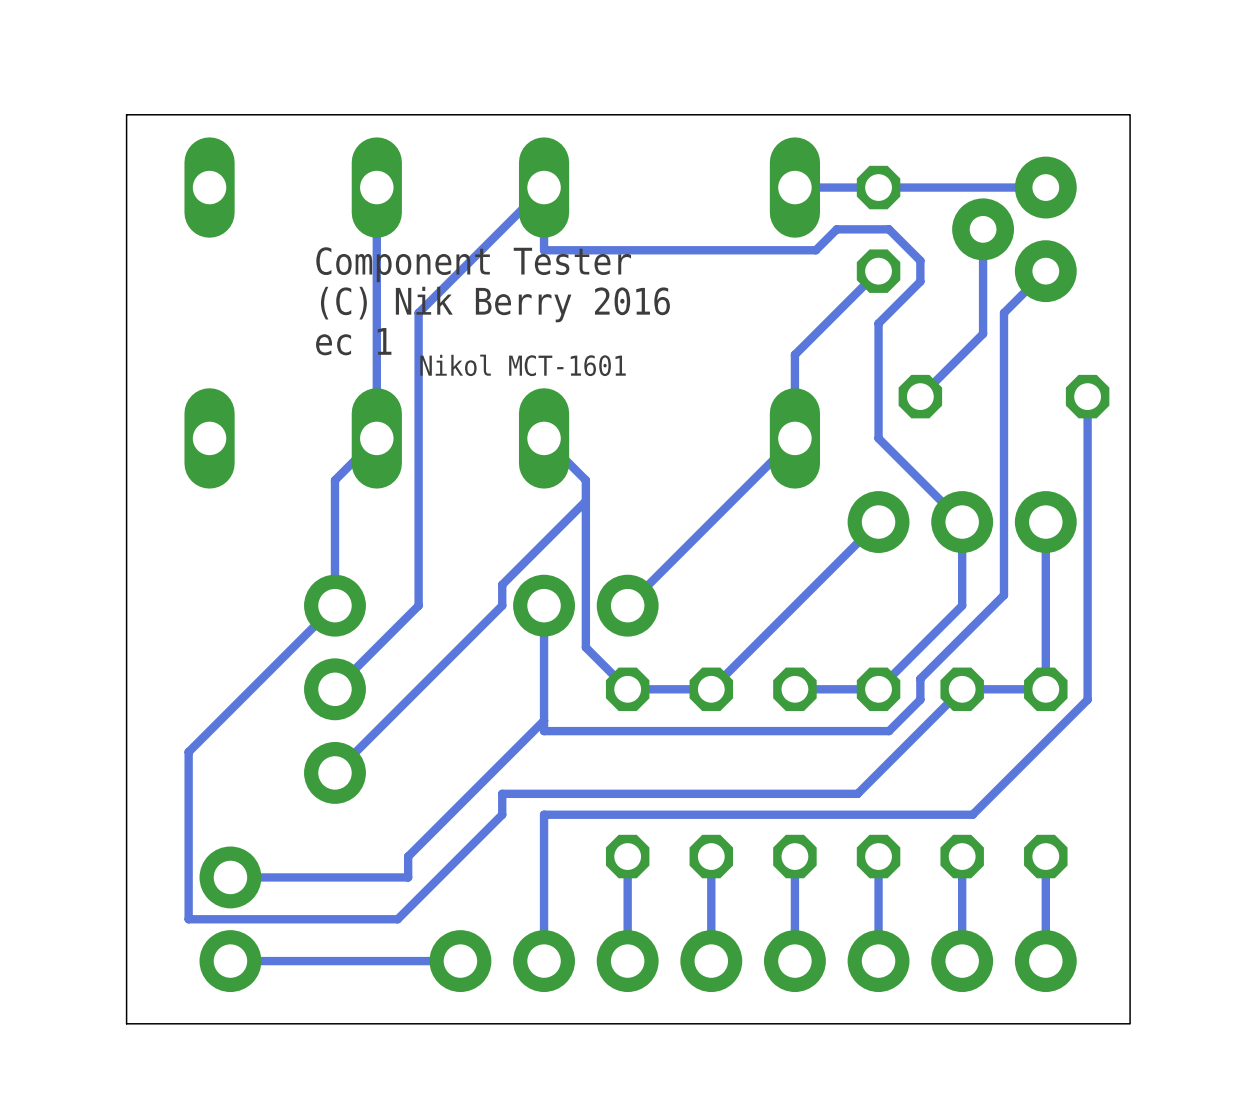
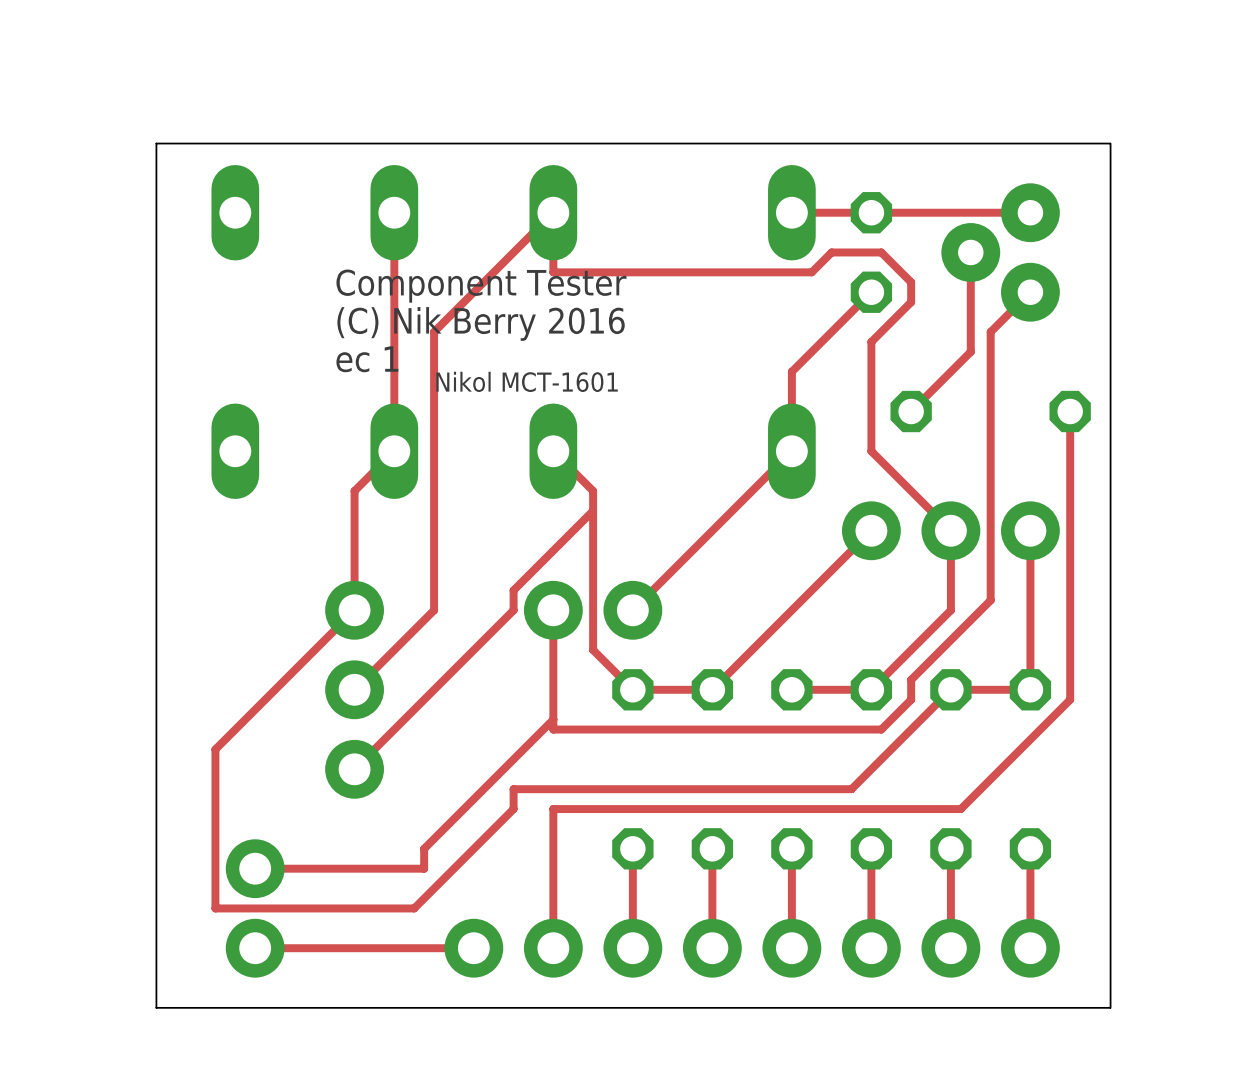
bottom track: (376, 187) (376, 438) (334, 480) (334, 605) (188, 752) (188, 919) (397, 919) (502, 814) (502, 793) (857, 793) (962, 689) (1045, 689) (1045, 522) -> none
top track: none -> (394, 212) (394, 451) (354, 491) (354, 610) (215, 749) (215, 908) (414, 908) (513, 809) (513, 789) (851, 789) (950, 689) (1030, 689) (1030, 530)
bottom track: (1045, 187) (794, 187) -> none
top track: none -> (1030, 212) (791, 212)
bottom track: (983, 229) (983, 333) (920, 396) -> none
top track: none -> (970, 252) (970, 351) (911, 411)
bottom track: (878, 271) (794, 354) (794, 438) (627, 605) -> none
top track: none -> (871, 292) (791, 371) (791, 451) (632, 610)
bottom track: (1045, 271) (1003, 312) (1003, 595) (920, 678) (920, 699) (889, 731) (544, 731) (544, 605) -> none
top track: none -> (1030, 292) (990, 331) (990, 600) (911, 679) (911, 699) (881, 729) (553, 729) (553, 610)
bottom track: (1087, 396) (1087, 699) (972, 814) (544, 814) (544, 961) -> none
top track: none -> (1070, 411) (1070, 699) (960, 809) (553, 809) (553, 948)
bottom track: (544, 438) (585, 480) (585, 647) (627, 689) (711, 689) (878, 522) -> none
top track: none -> (553, 451) (593, 491) (593, 650) (632, 689) (712, 689) (871, 530)
bottom track: (585, 501) (502, 584) (502, 605) (334, 772) -> none
top track: none -> (593, 510) (513, 590) (513, 610) (354, 769)
bottom track: (794, 689) (878, 689) (962, 605) (962, 522) (878, 438) (878, 323) (920, 281) (920, 260) (889, 229) (836, 229) (815, 250) (544, 250) (544, 187) (418, 312) (418, 605) (334, 689) -> none
top track: none -> (791, 689) (871, 689) (950, 610) (950, 530) (871, 451) (871, 341) (911, 302) (911, 282) (881, 252) (831, 252) (811, 272) (553, 272) (553, 212) (434, 331) (434, 610) (354, 689)
bottom track: (544, 720) (408, 856) (408, 877) (230, 877) -> none
top track: none -> (553, 719) (424, 848) (424, 868) (255, 868)
bottom track: (627, 856) (627, 961) -> none
top track: none -> (632, 848) (632, 948)
bottom track: (711, 856) (711, 961) -> none
top track: none -> (712, 848) (712, 948)
bottom track: (794, 856) (794, 961) -> none
top track: none -> (791, 848) (791, 948)
bottom track: (878, 856) (878, 961) -> none
top track: none -> (871, 848) (871, 948)
bottom track: (962, 856) (962, 961) -> none
top track: none -> (950, 848) (950, 948)
bottom track: (1045, 856) (1045, 961) -> none
top track: none -> (1030, 848) (1030, 948)
bottom track: (460, 961) (230, 961) -> none
top track: none -> (473, 948) (255, 948)

